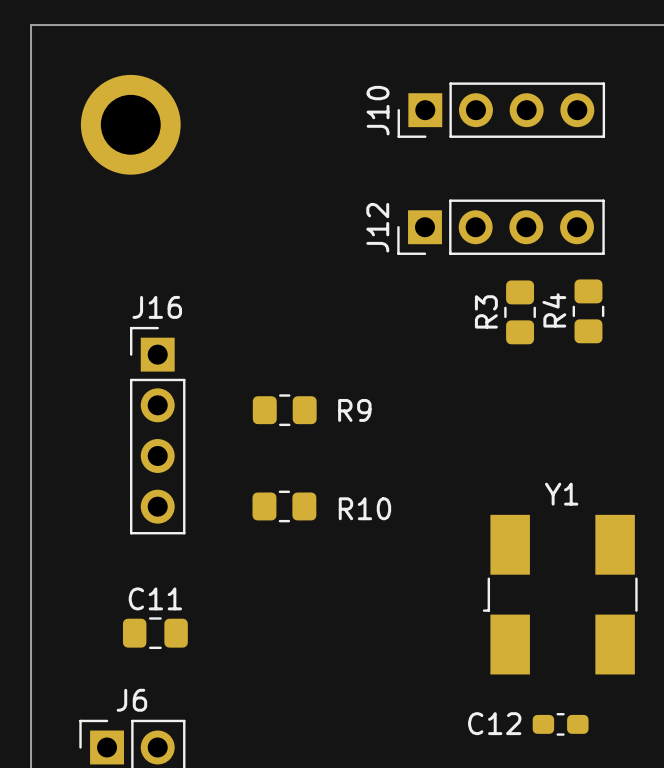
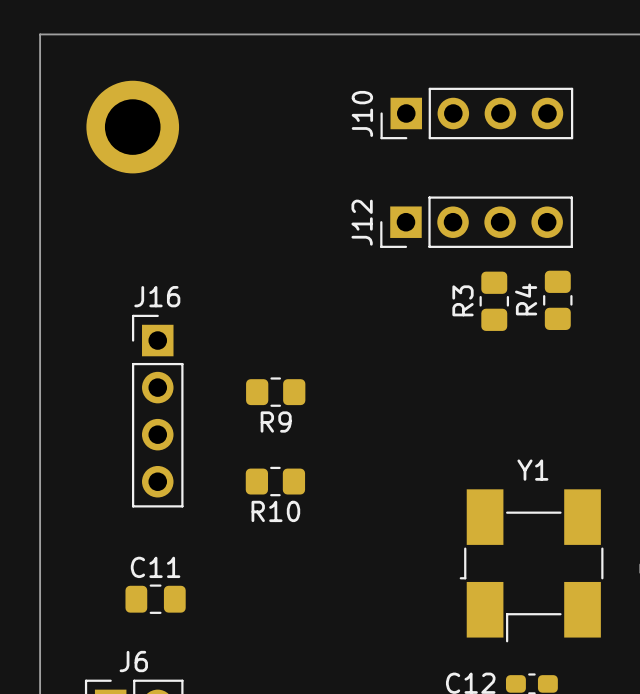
R9 name position: R9 (354, 410) -> R9 (276, 422)
R10 name position: R10 (364, 508) -> R10 (275, 511)
Y1 footprint: [482, 514, 638, 675] -> [459, 489, 604, 643]

